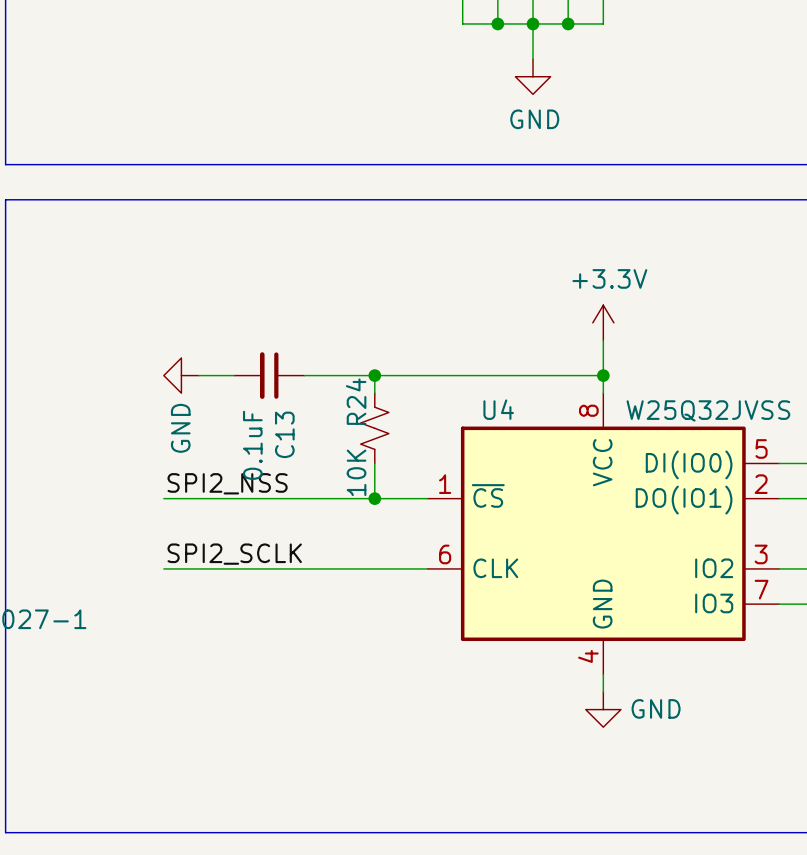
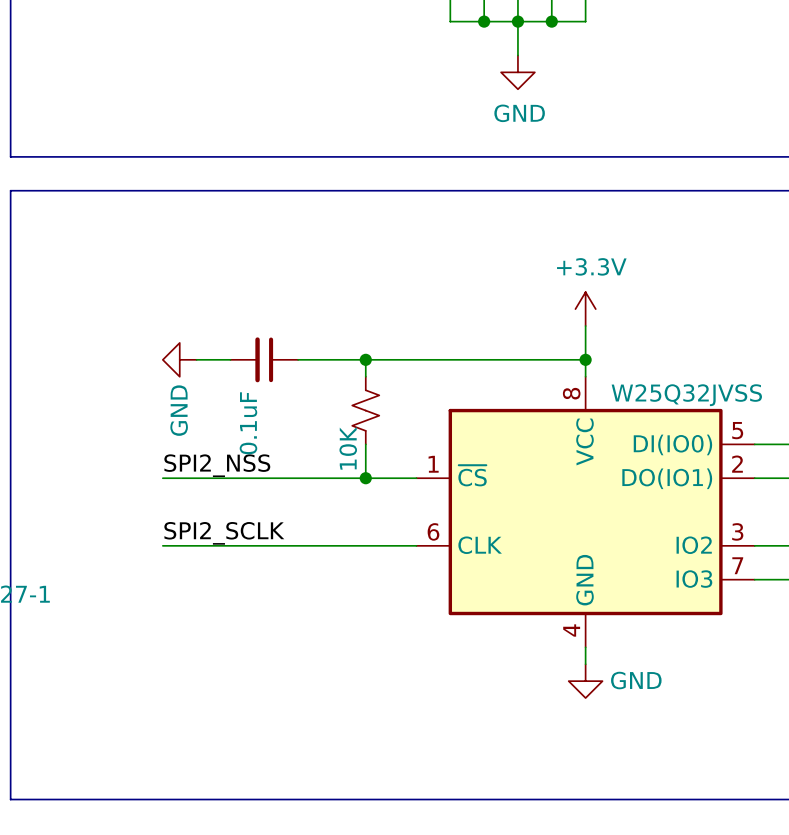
R24 name: R24 (356, 401) -> none
U4 name: U4 (498, 409) -> none
C13 name: C13 (284, 434) -> none

